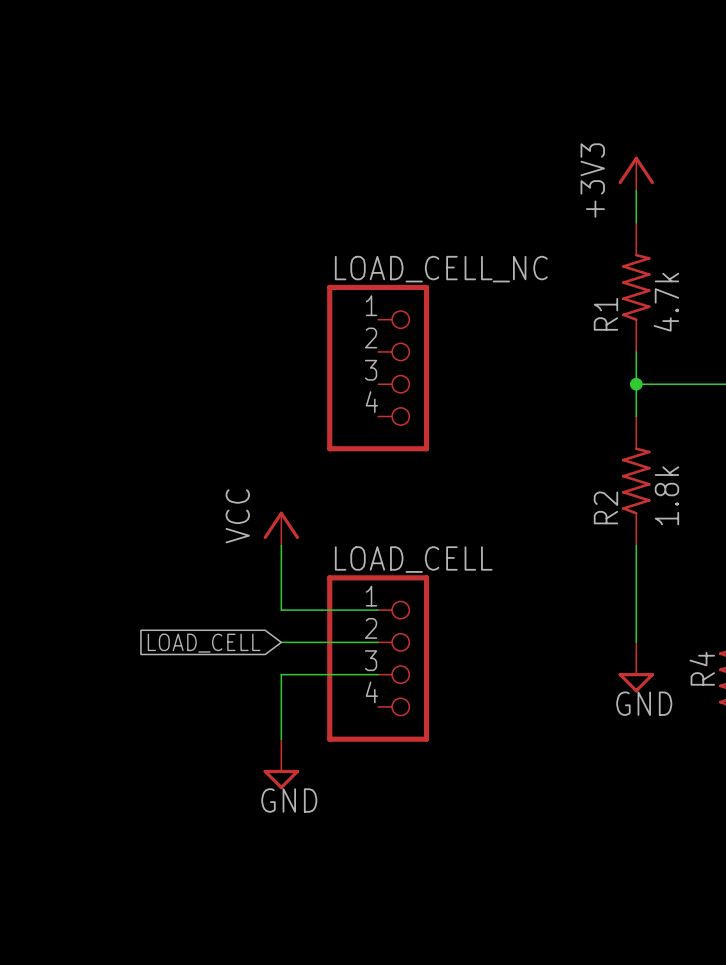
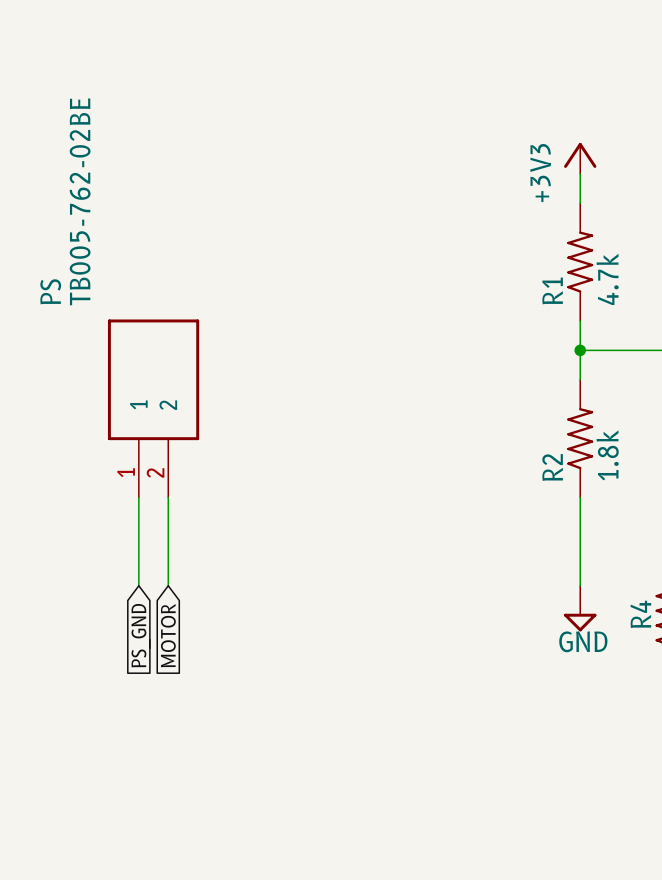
LOAD_CELL_NC: (378, 368) -> none
PS: none -> TB005-762-02BE (153, 408)
power symbol: VCC (281, 528) -> none
wire: none -> (138, 497) (138, 585)
wire: none -> (168, 497) (168, 585)
wire: (281, 545) (281, 610) (378, 610) -> none
wire: (281, 642) (378, 642) -> none
global label: LOAD_CELL (204, 643) -> none
LOAD_CELL: (378, 658) -> none
wire: (378, 674) (281, 674) (281, 739) -> none
global label: none -> MOTOR (168, 635)
global label: none -> PS_GND (141, 635)
power symbol: GND (281, 764) -> none

